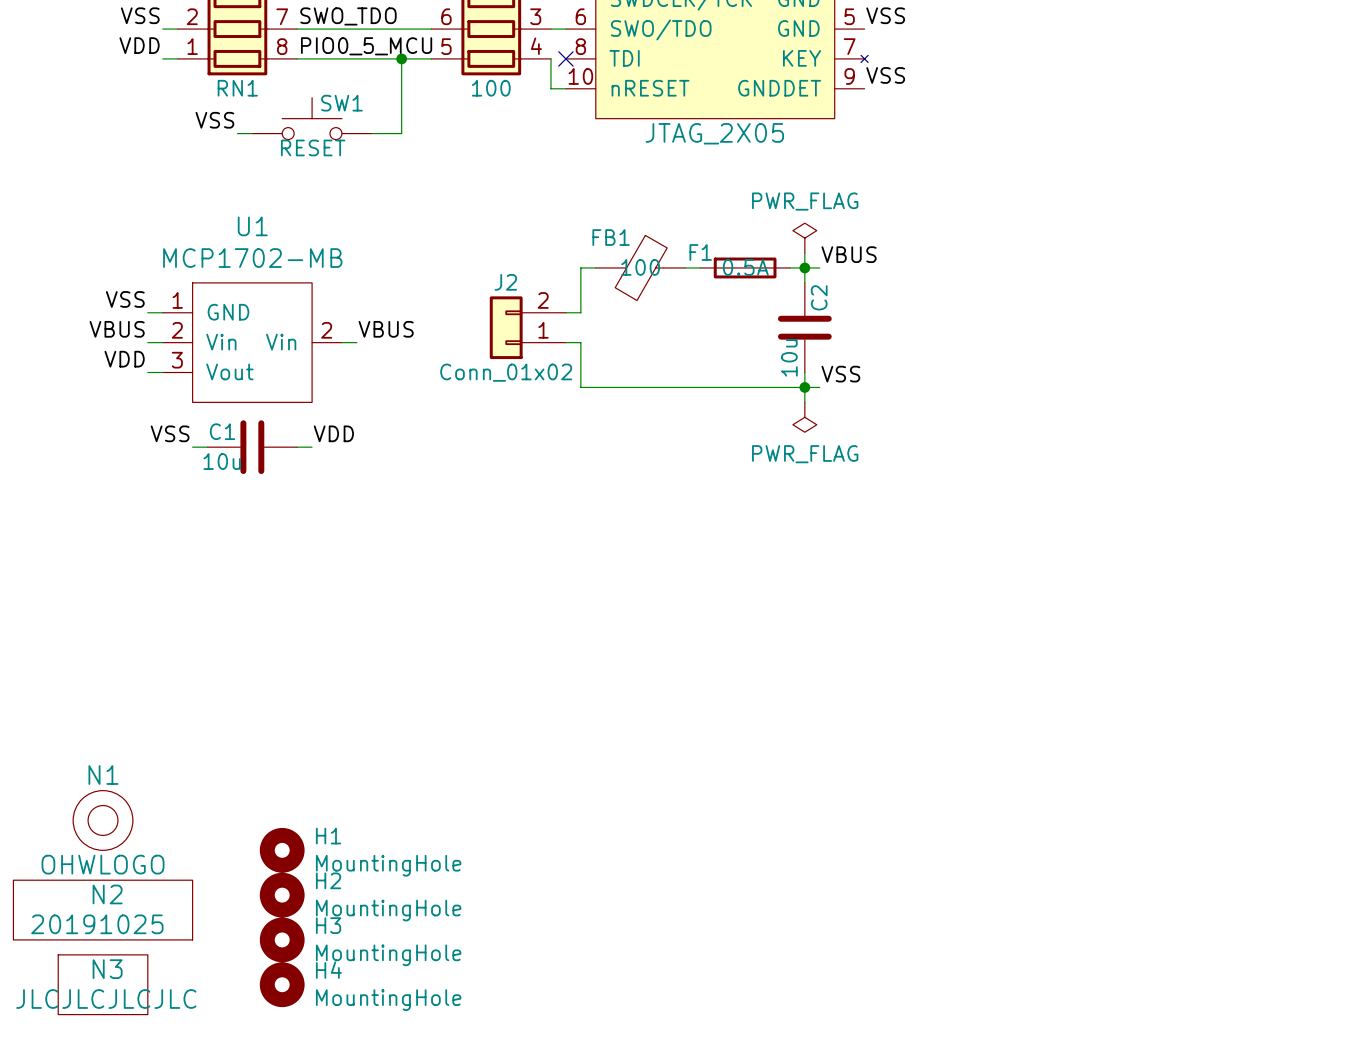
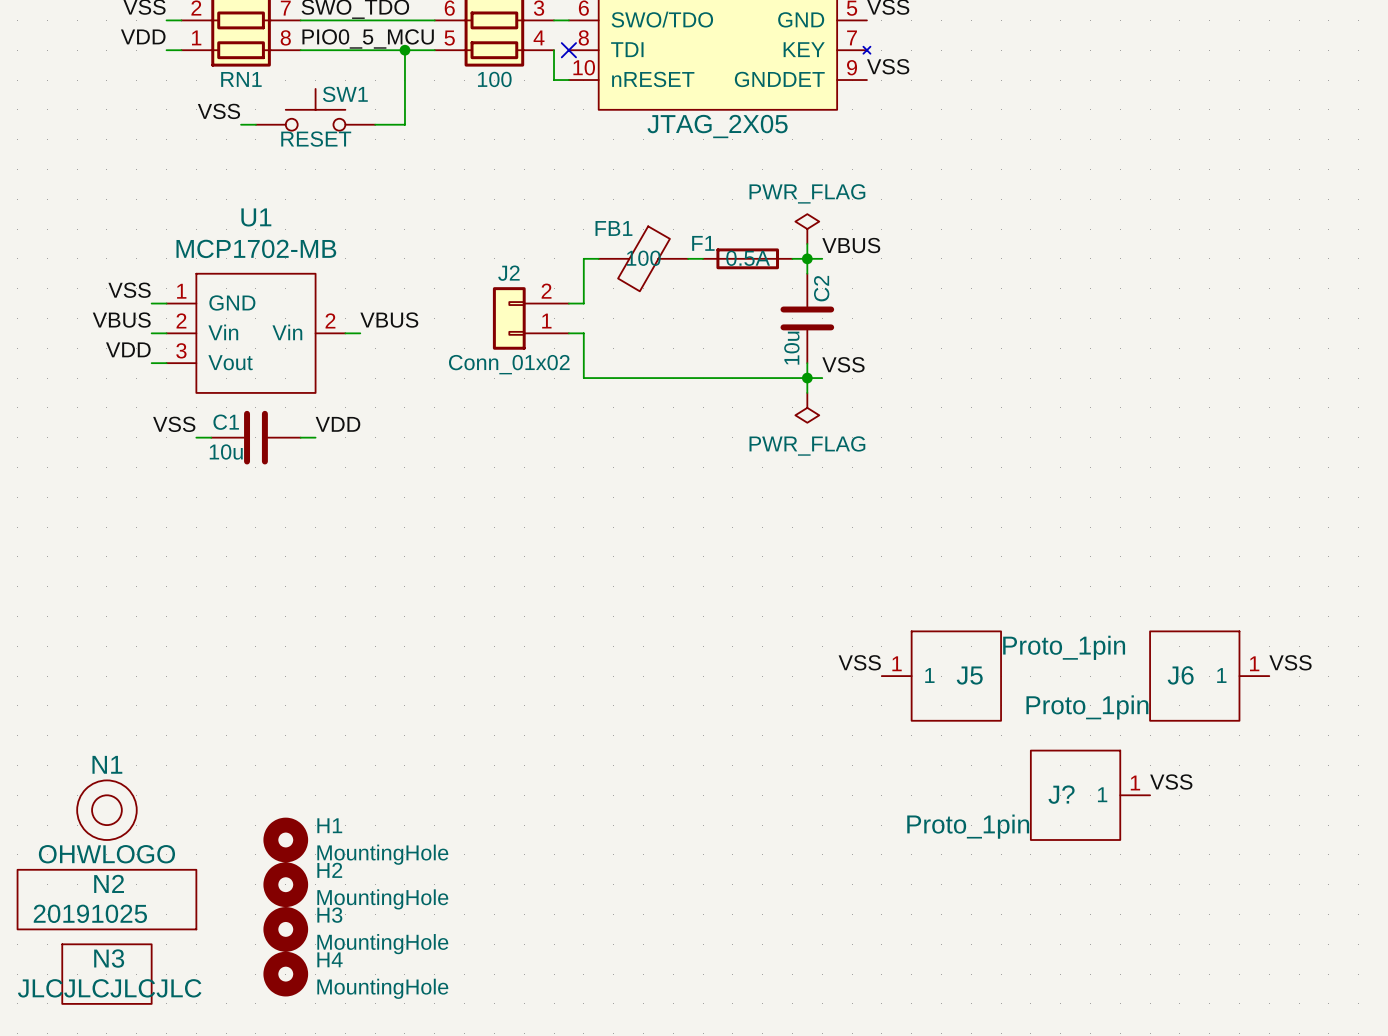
label: none -> VSS (859, 662)
label: none -> VSS (1290, 662)
J5: none -> Proto_1pin (941, 676)
J6: none -> Proto_1pin (1209, 676)
label: none -> VSS (1171, 781)
J?: none -> Proto_1pin (1090, 795)

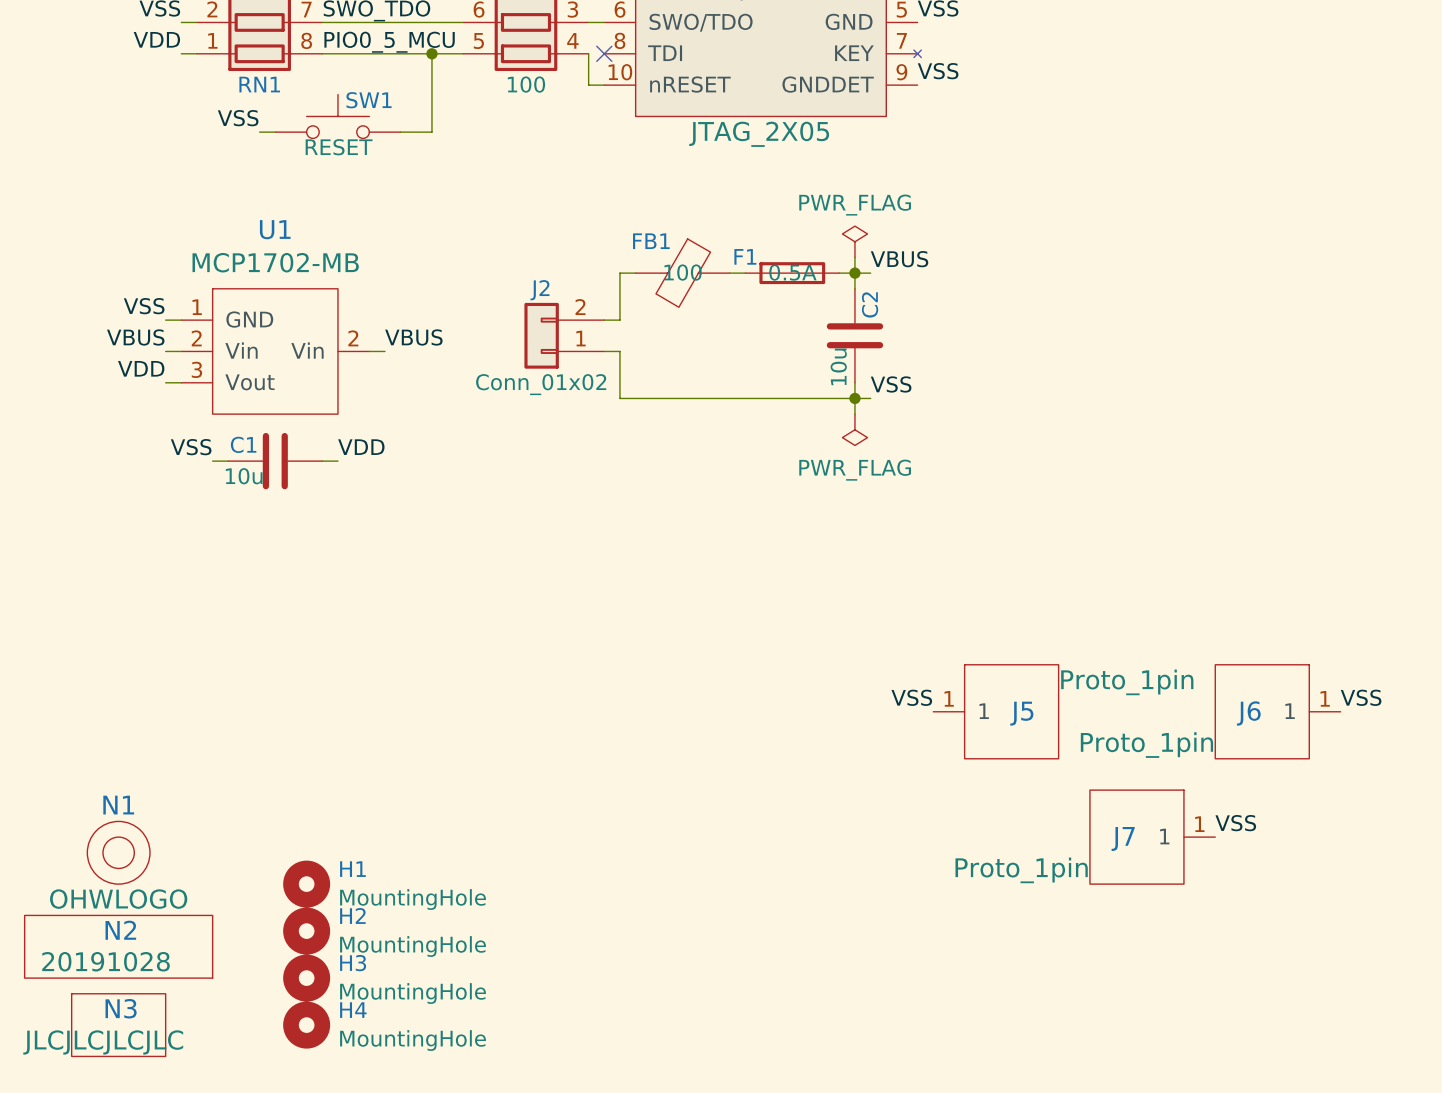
J? name: J? (1061, 794) -> J7 (1123, 838)
N2 value: 20191025 (90, 913) -> 20191028 (106, 961)

